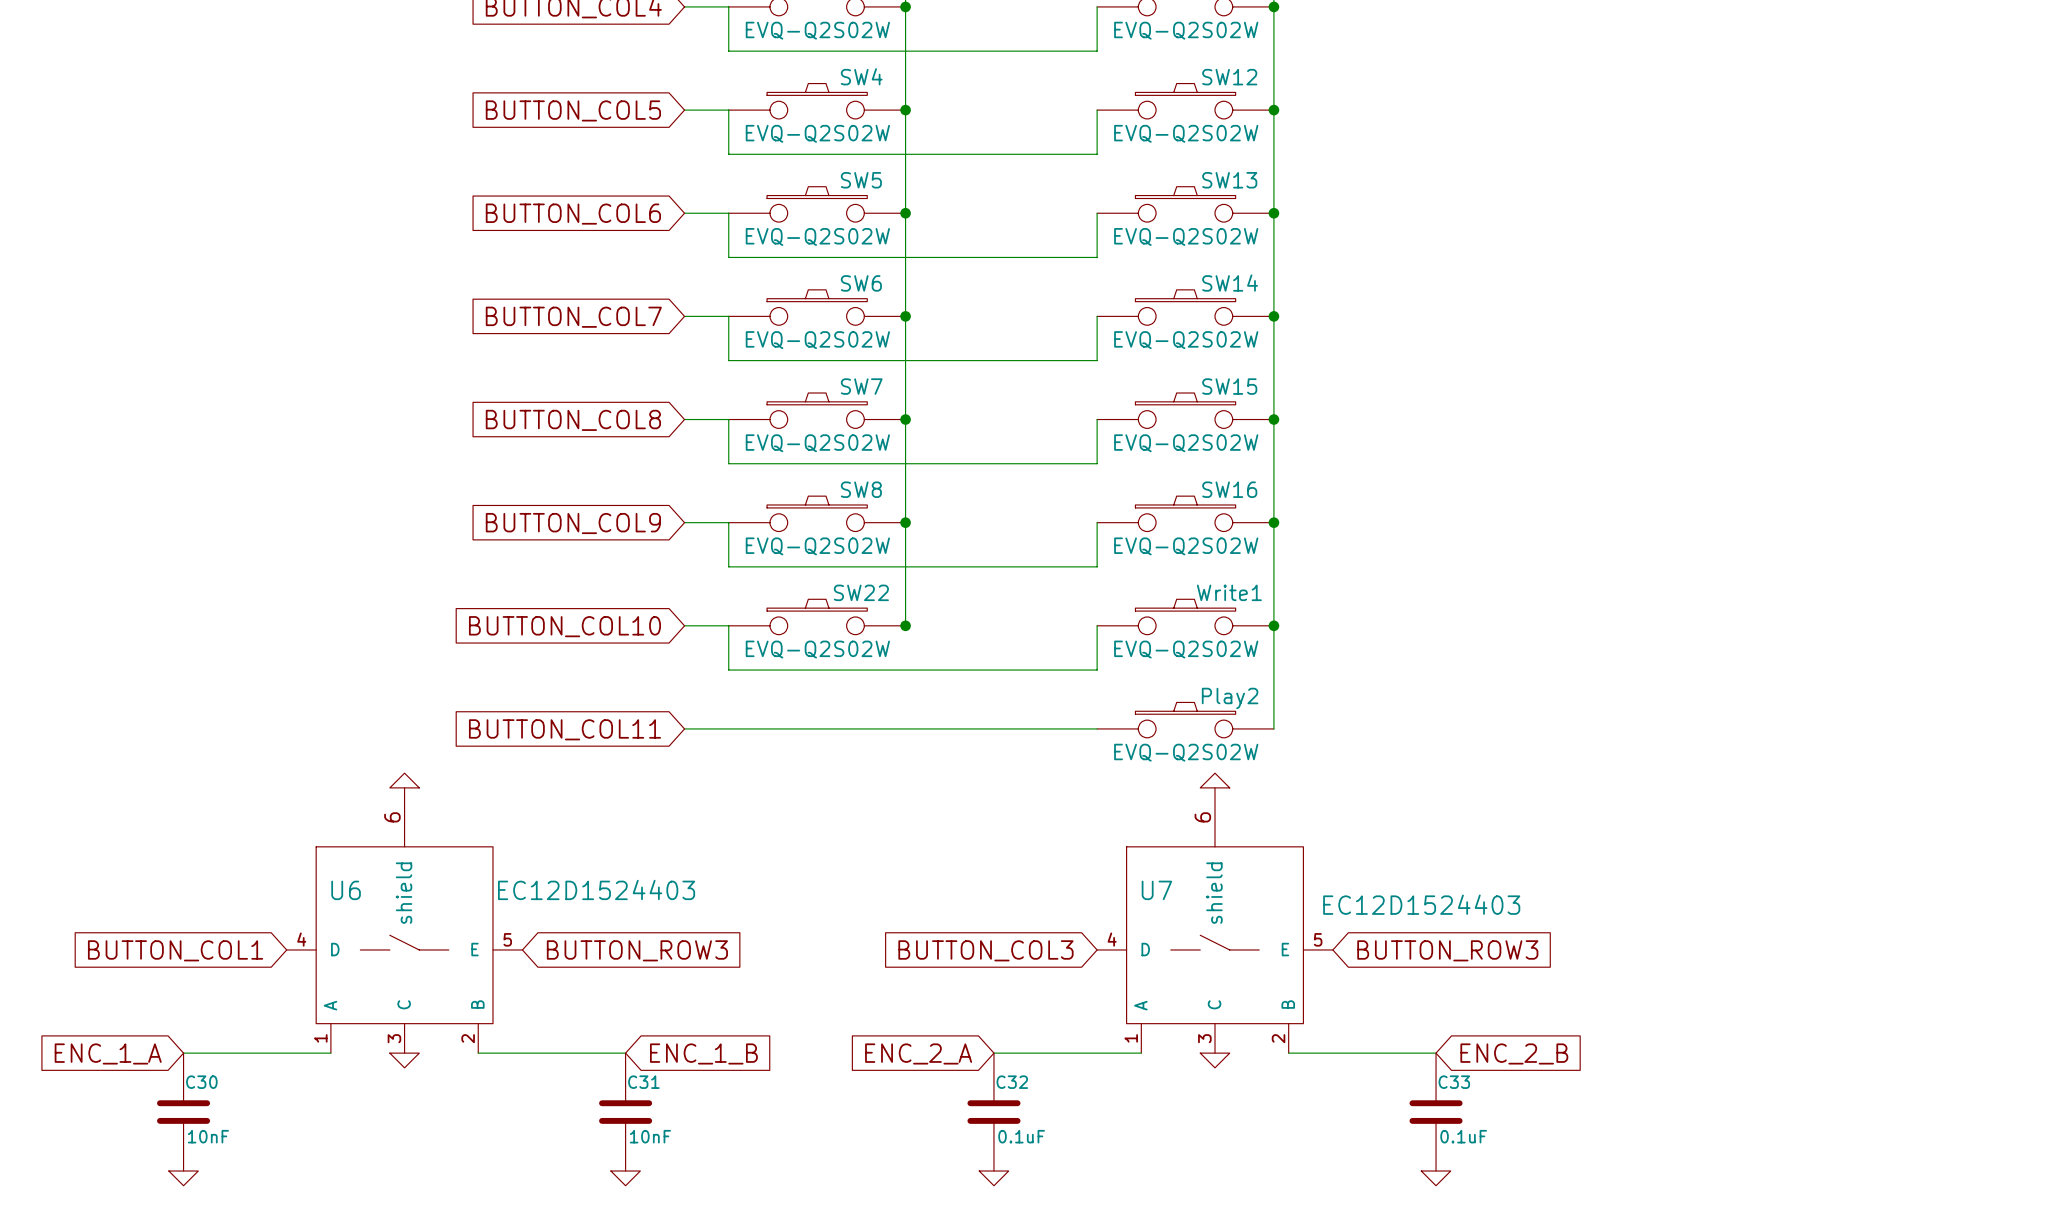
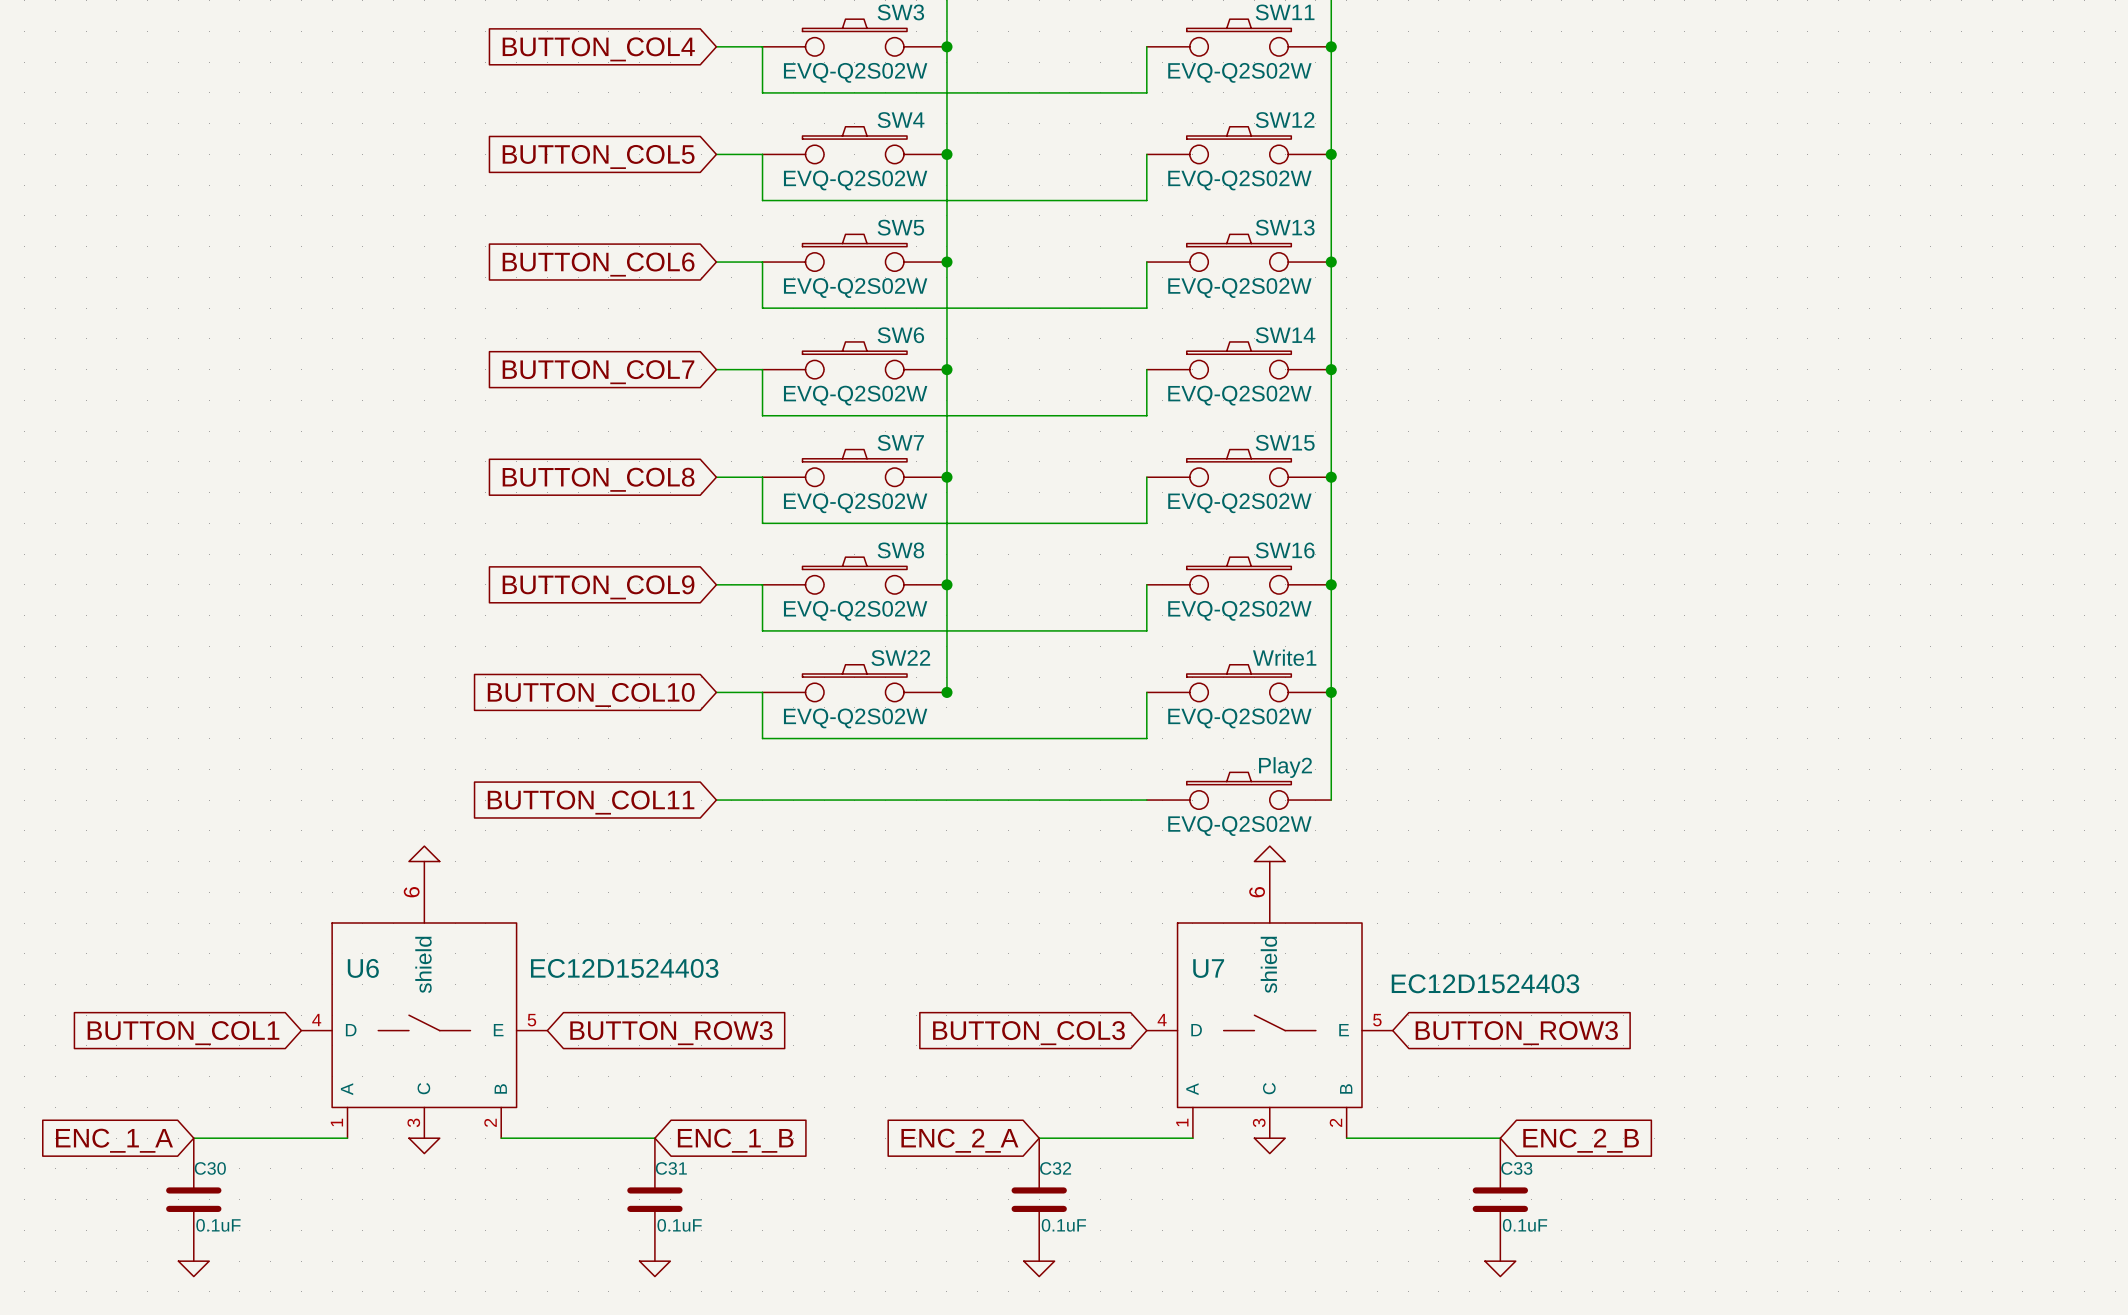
C30 value: 10nF (208, 1136) -> 0.1uF (218, 1225)
C31 value: 10nF (650, 1136) -> 0.1uF (679, 1225)

